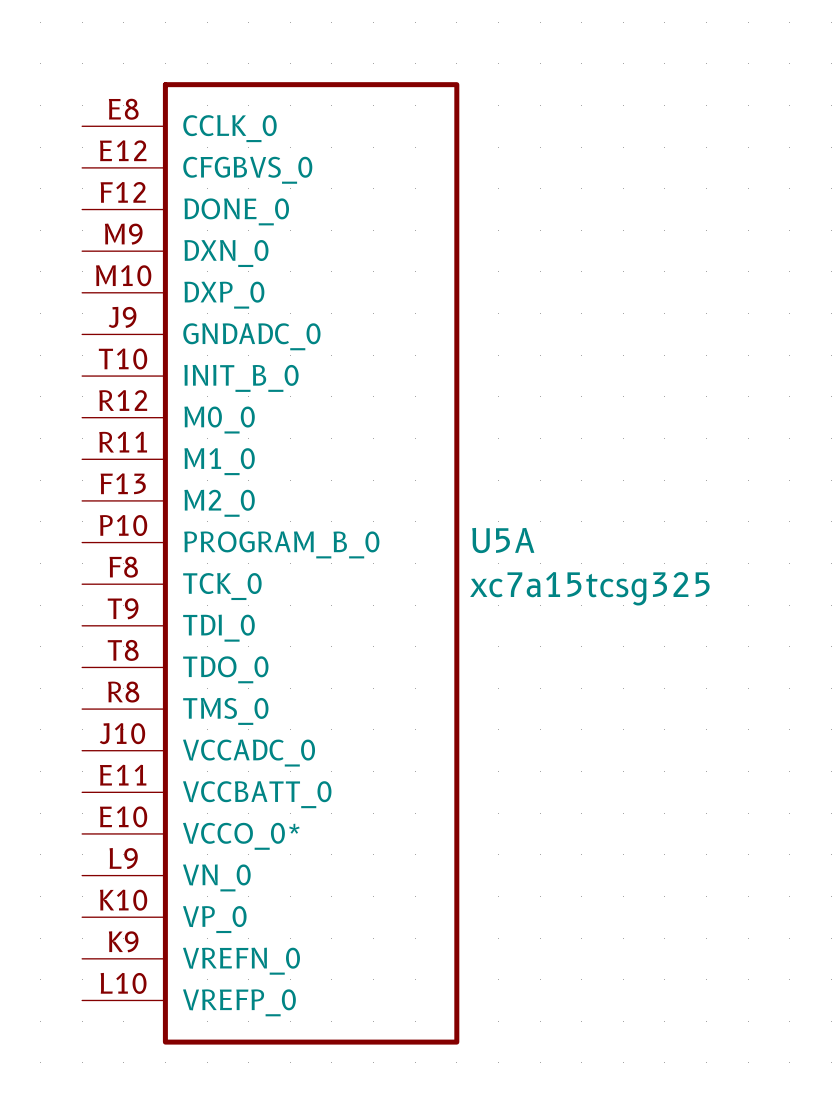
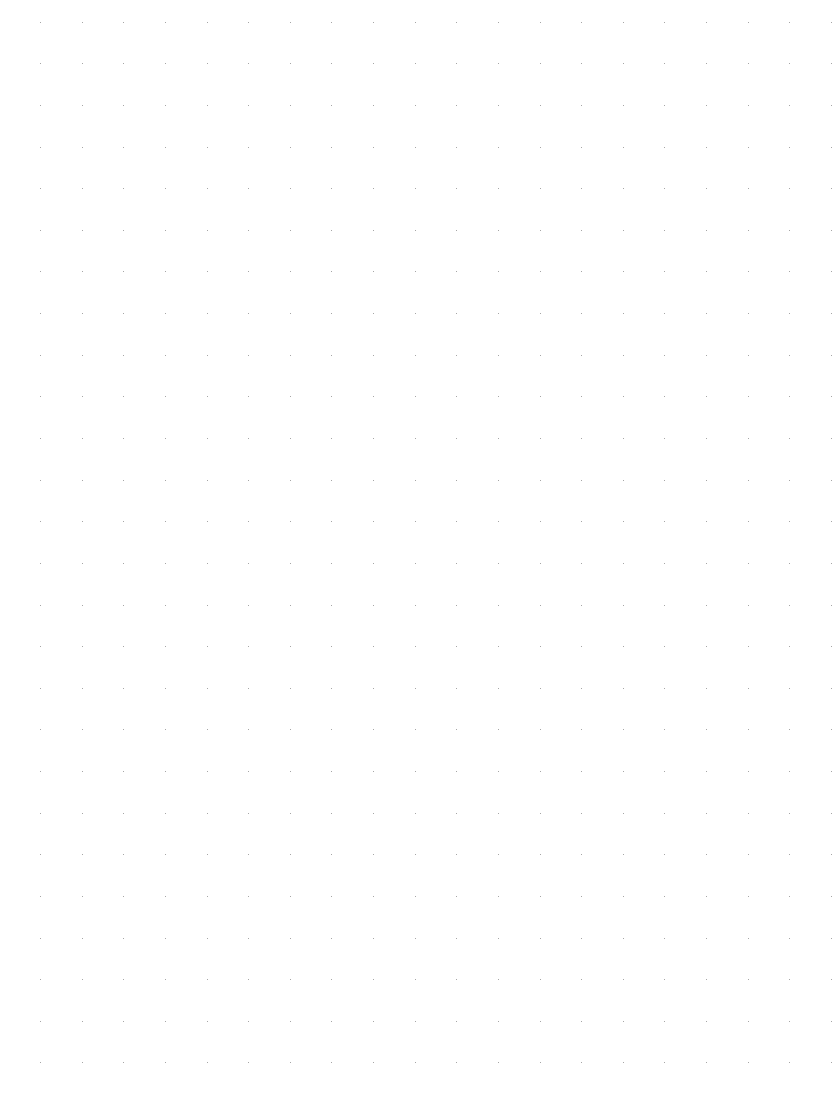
U5A: xc7a15tcsg325 (270, 563) -> none

